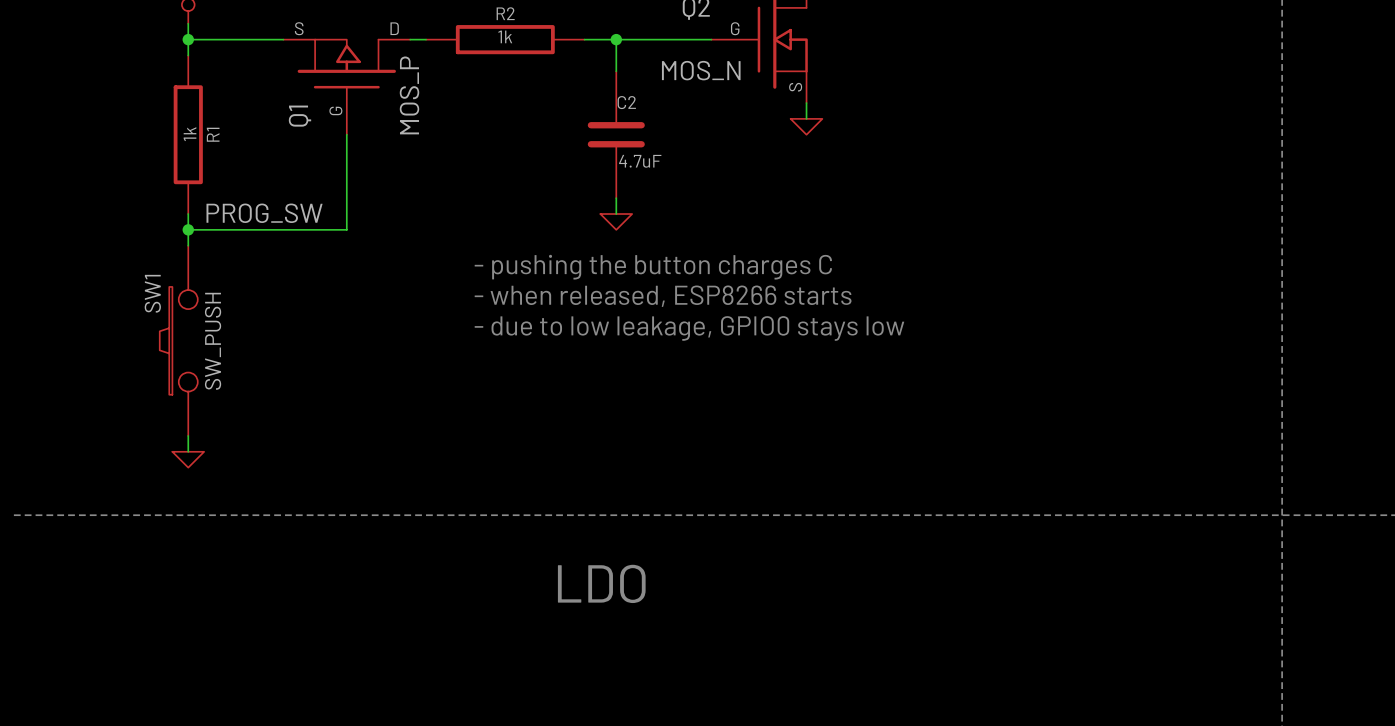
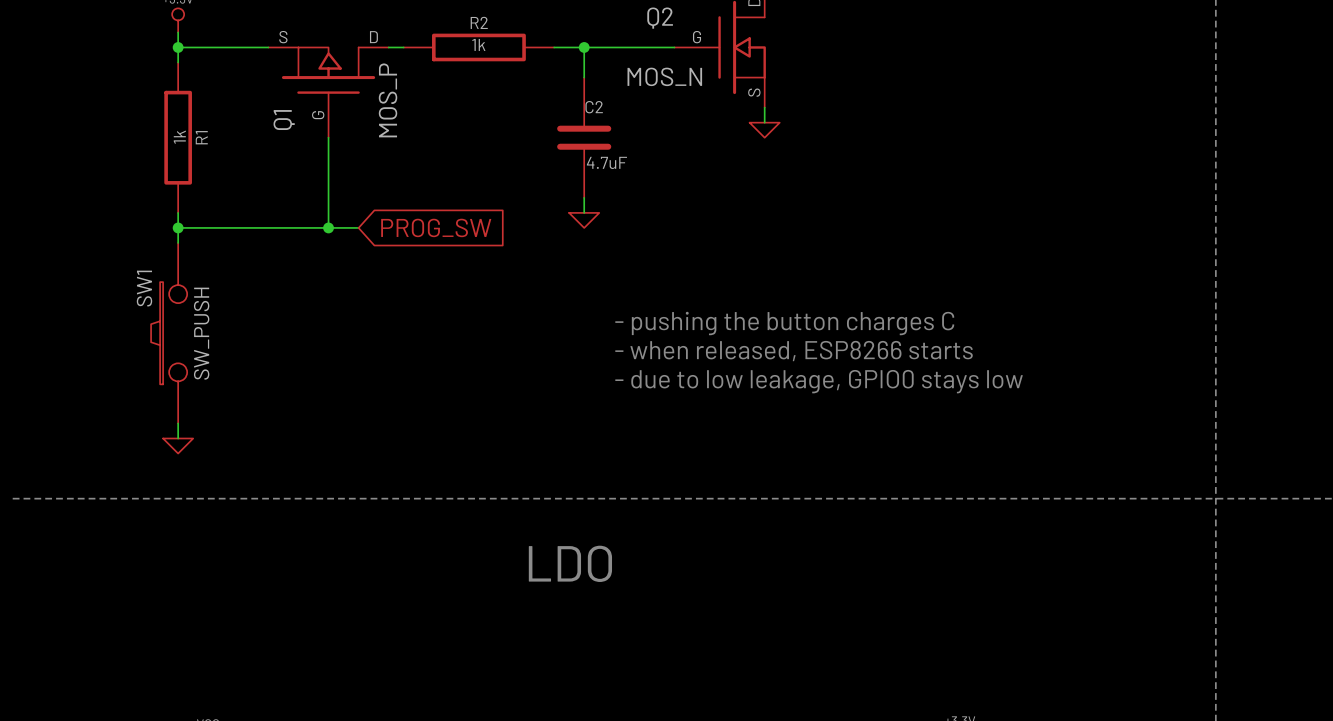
label: PROG_SW (264, 213) -> none
wire: none -> (328, 227) (358, 227)
junction: none -> (328, 227)
global label: none -> PROG_SW (436, 227)
text position: - pushing the button charges C (653, 267) -> - pushing the button charges C (784, 323)
text position: - when released, ESP8266 starts (663, 296) -> - when released, ESP8266 starts (794, 351)
text position: - due to low leakage, GPIO0 stays low (689, 328) -> - due to low leakage, GPIO0 stays low (819, 381)

